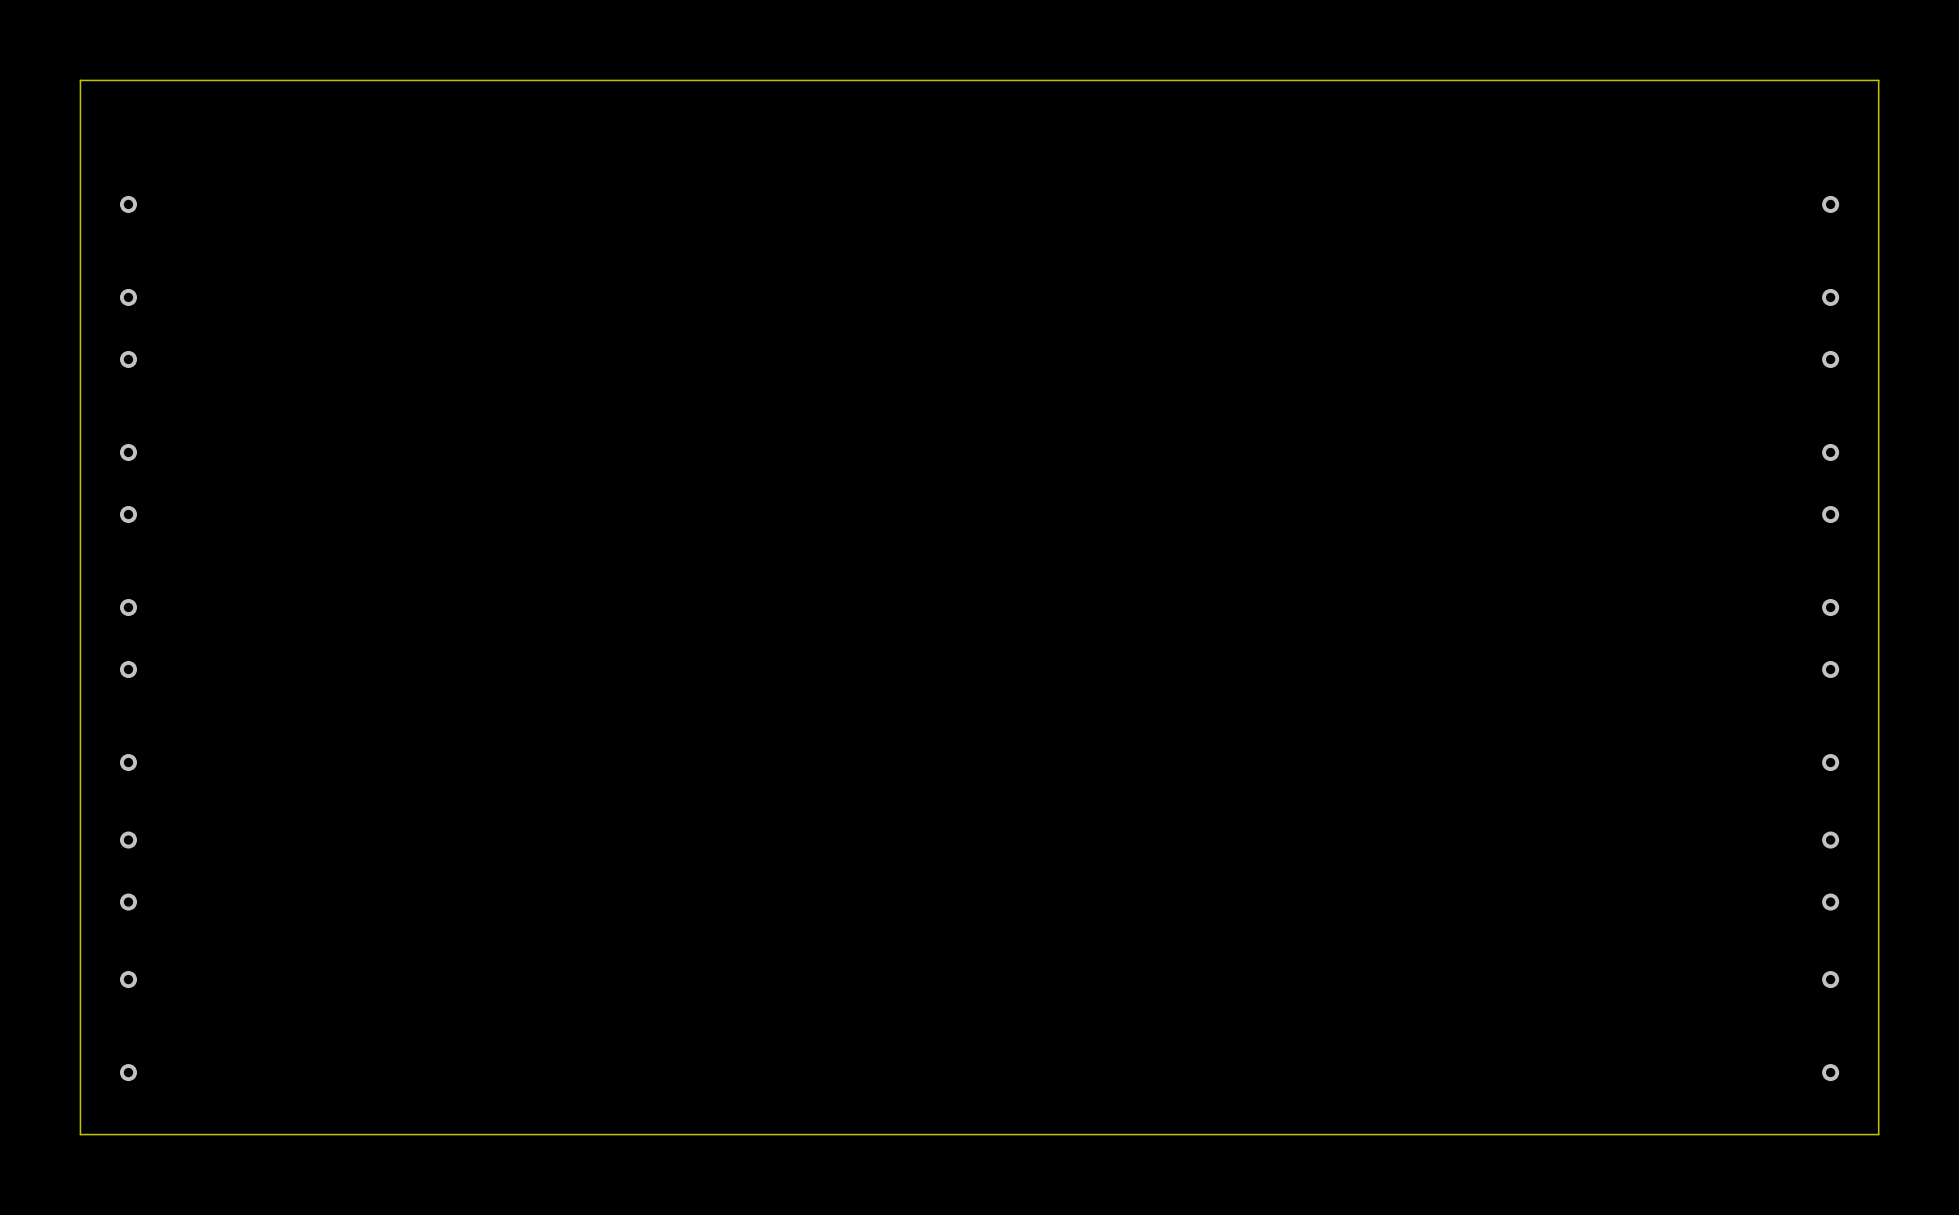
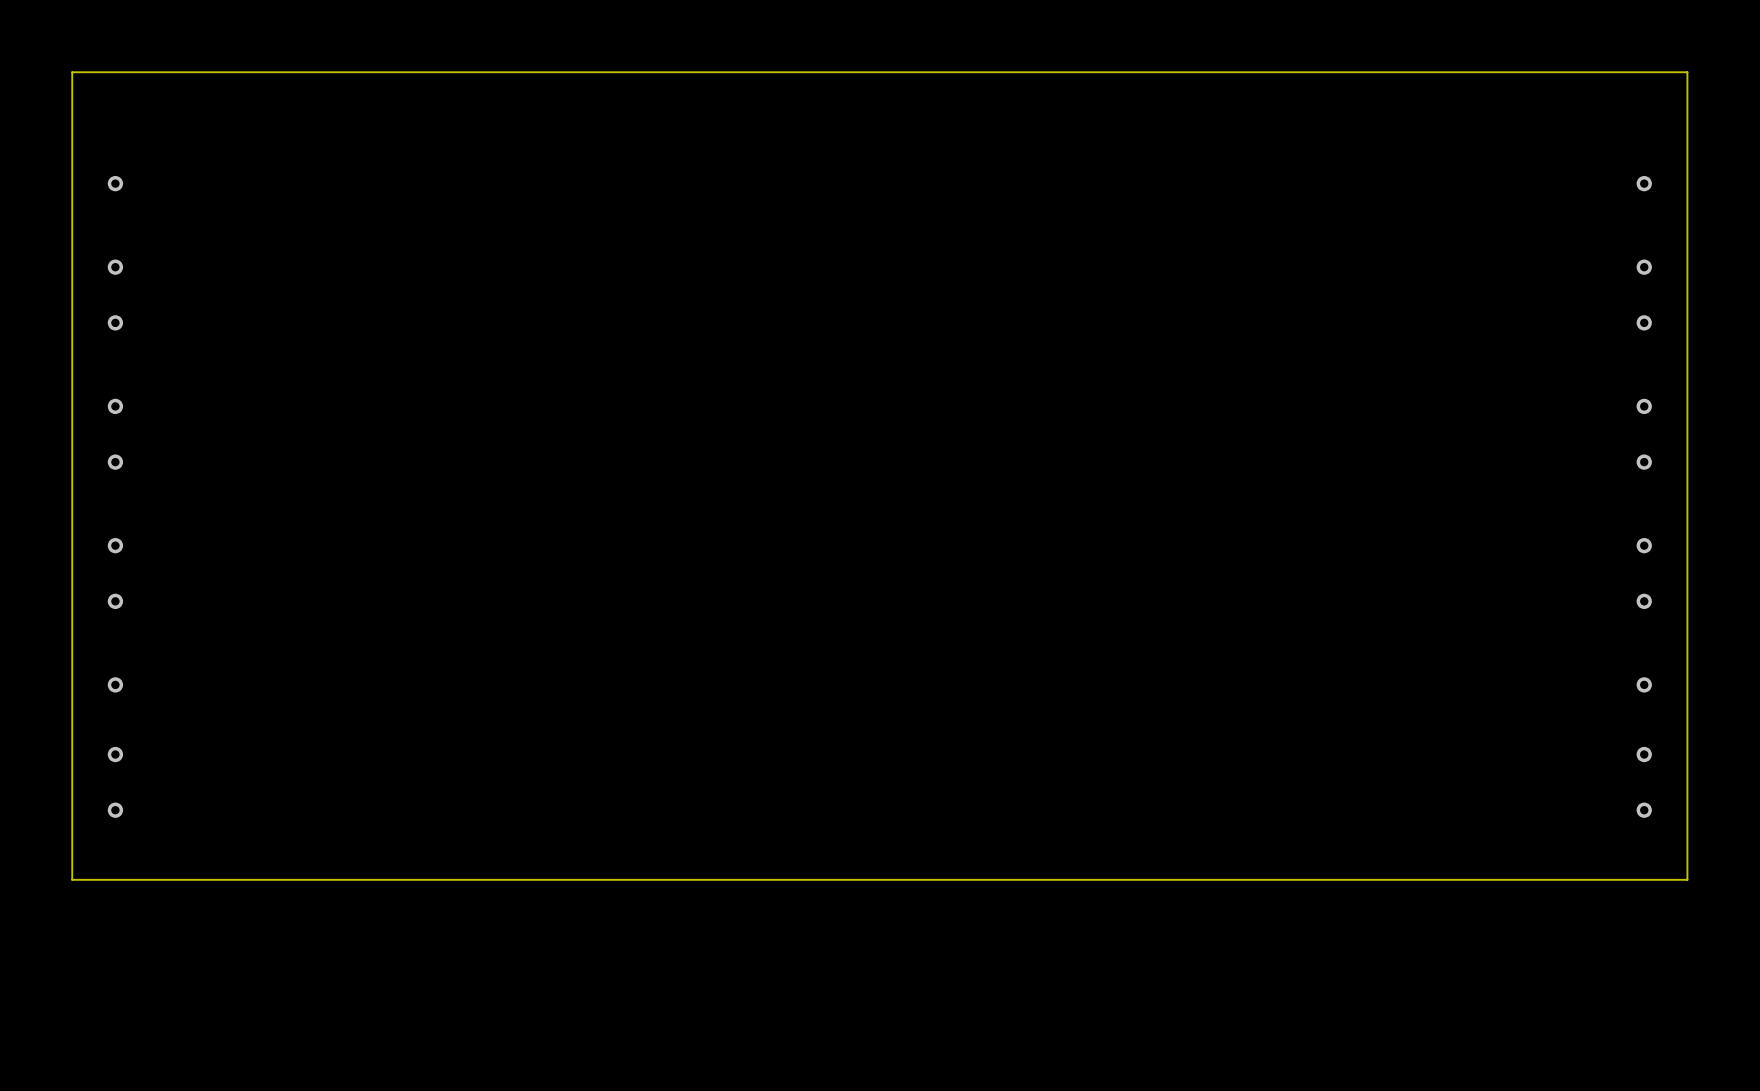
via: (128, 979) -> none
via: (1830, 979) -> none
board edge: (1878, 979) (1878, 1134) (80, 1134) (80, 979) -> (1687, 879) (72, 879)
via: (128, 1072) -> none
via: (1830, 1072) -> none

